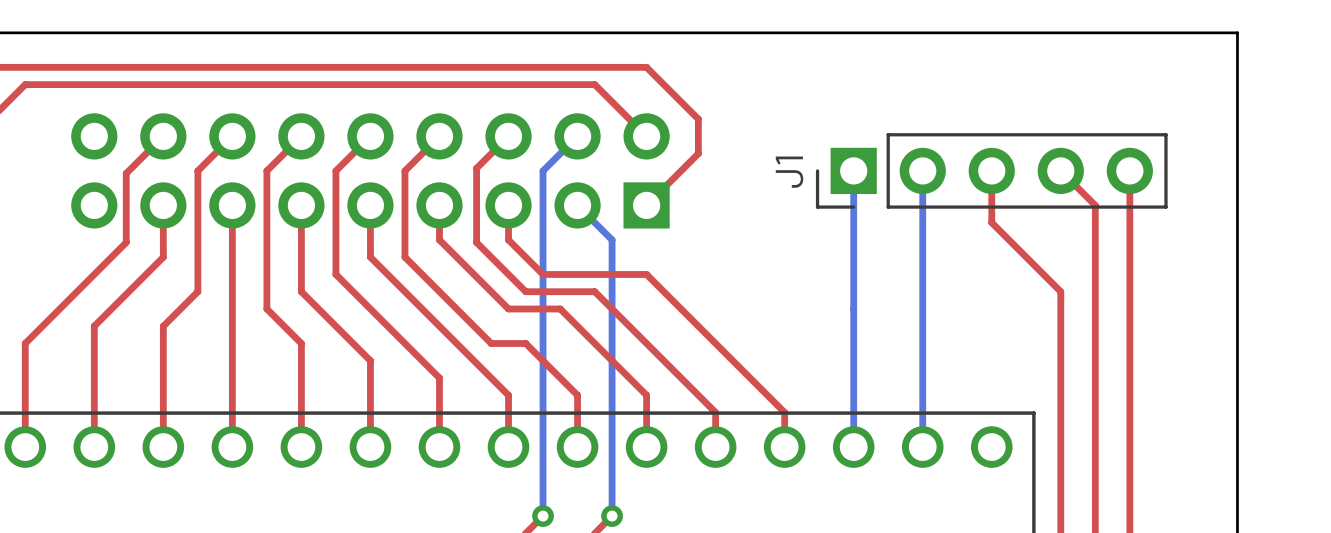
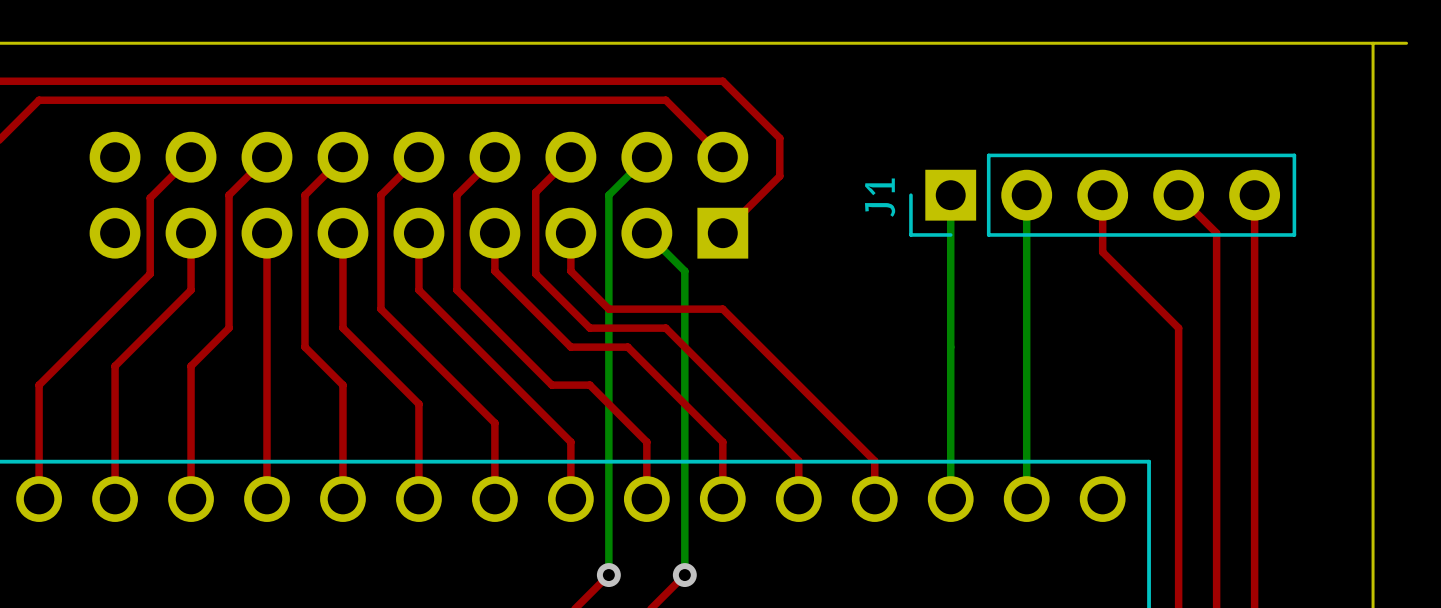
board edge: none -> (1373, 43) (1406, 43)

